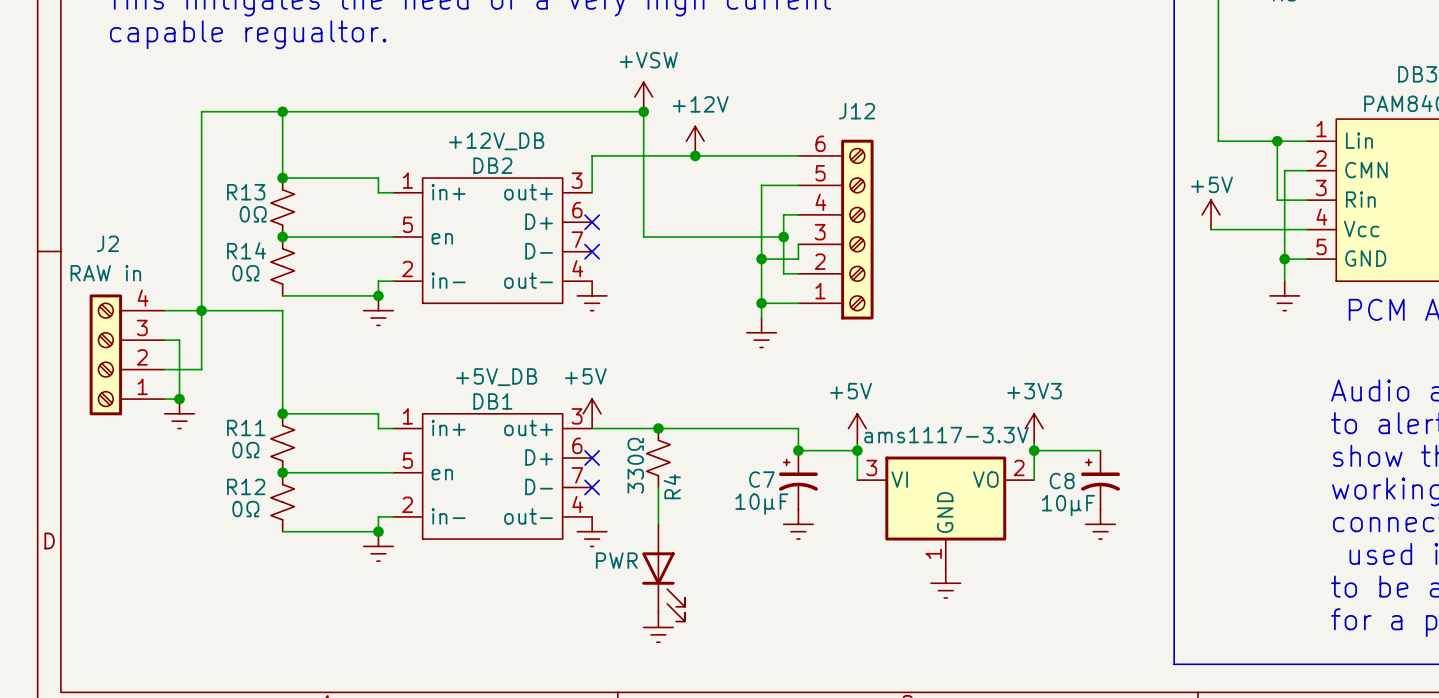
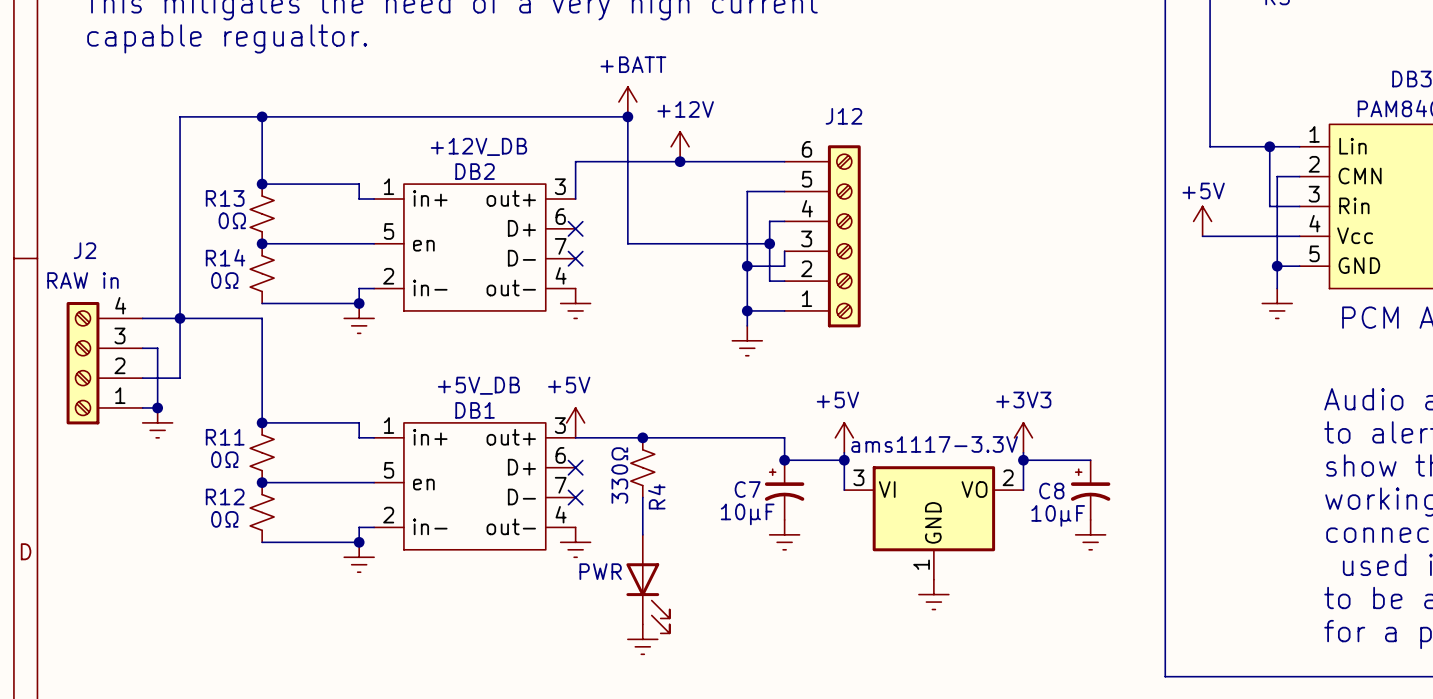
power symbol: +VSW (643, 96) -> +BATT (627, 101)

